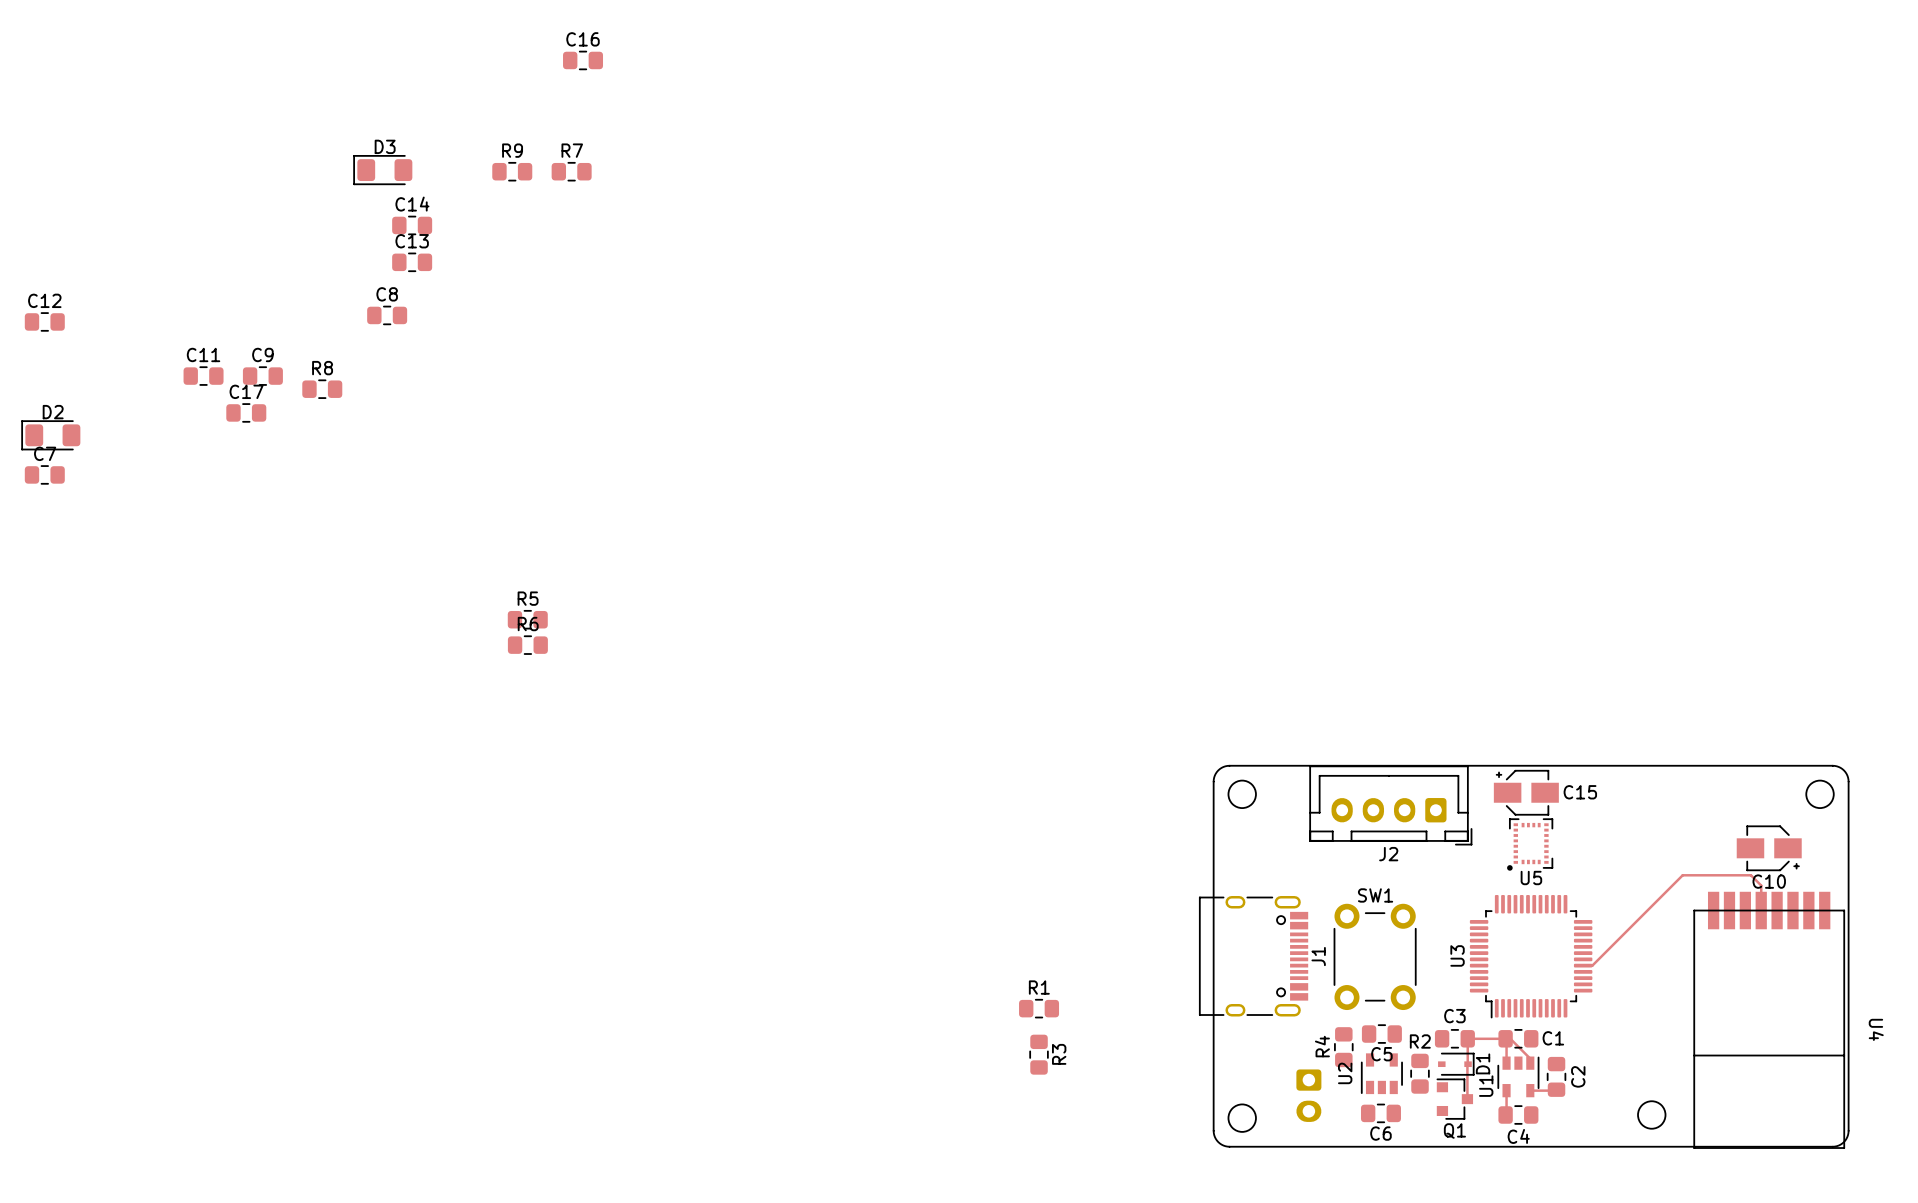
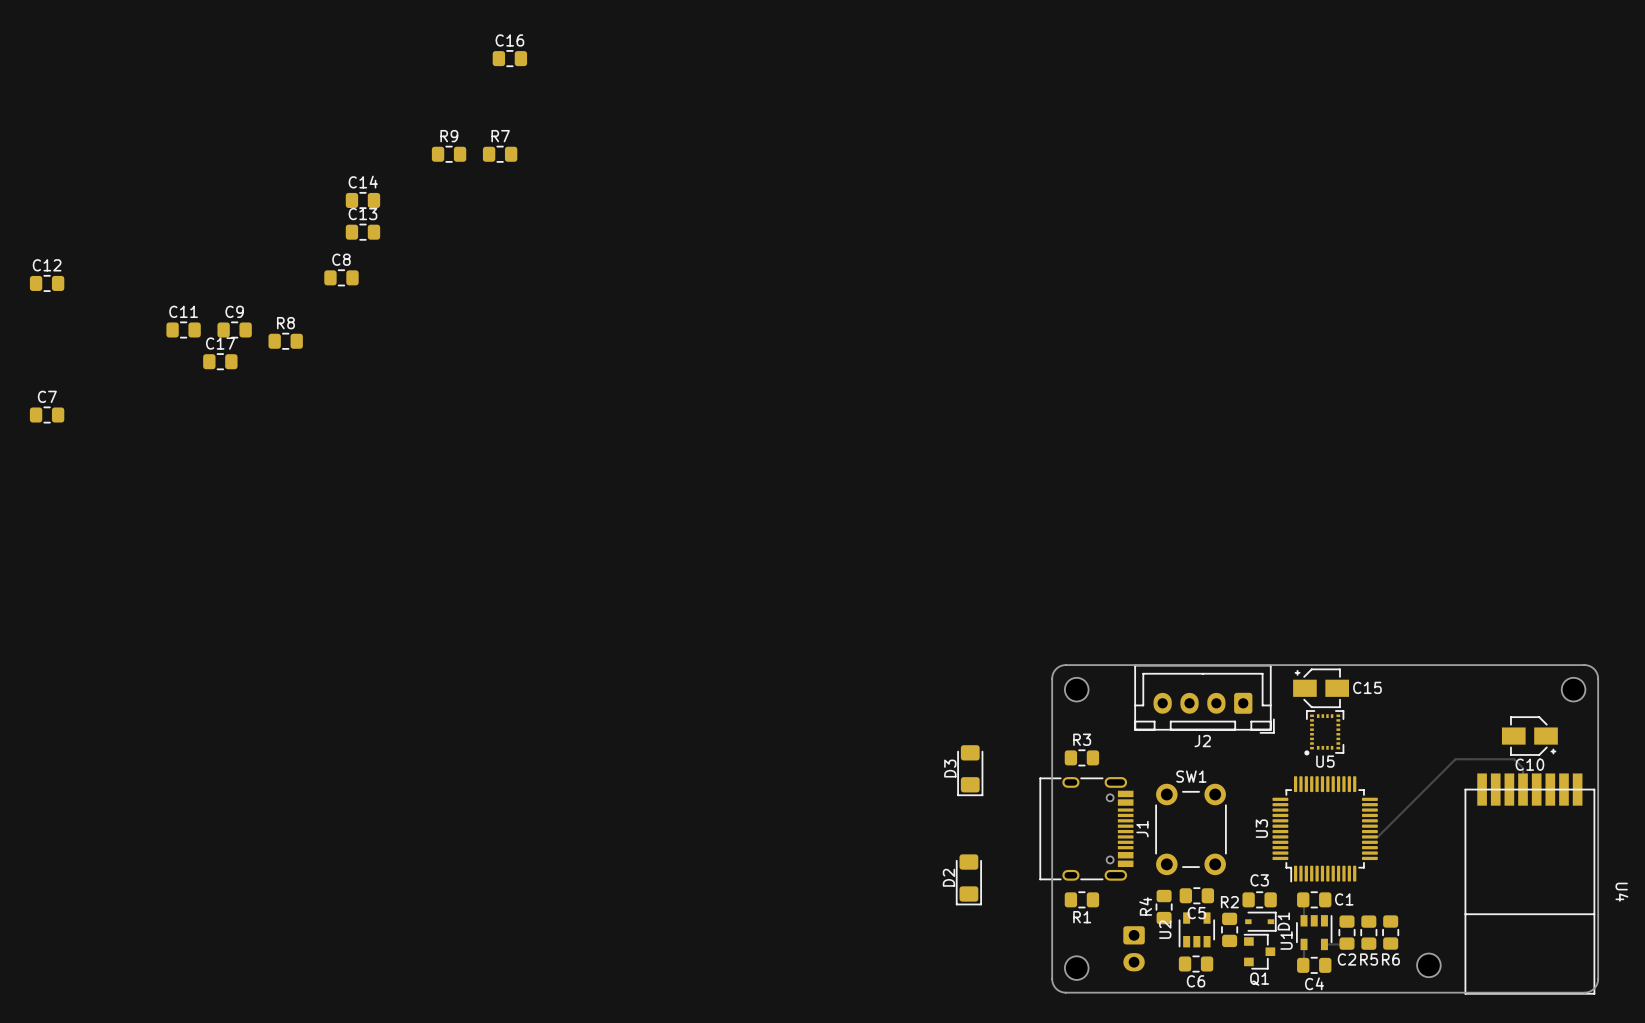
D3 rotation: 0° (382, 170) -> 90° counterclockwise (970, 770)
D3 position: (382, 170) -> (970, 770)
D2 rotation: 0° (50, 435) -> 90° counterclockwise (968, 879)
D2 position: (50, 435) -> (968, 879)
R5 name position: R5 (528, 598) -> R5 (1369, 959)
R5 rotation: 0° (527, 619) -> 90° clockwise (1368, 932)
R5 position: (527, 619) -> (1368, 932)
R6 name position: R6 (528, 624) -> R6 (1390, 959)
R6 rotation: 0° (527, 645) -> 90° clockwise (1390, 932)
R6 position: (527, 645) -> (1390, 932)
R1 name position: R1 (1039, 987) -> R1 (1082, 917)
R1 position: (1039, 1008) -> (1081, 899)
R3 rotation: 0° (1039, 1054) -> 90° clockwise (1081, 757)
R3 position: (1039, 1054) -> (1081, 757)
R3 name position: R3 (1059, 1054) -> R3 (1082, 739)
track: (1530, 1063) (1530, 1058) (1510, 1038) (1467, 1038) (1467, 1099) -> none
C2 name rotation: 0° (1578, 1076) -> 90° clockwise (1346, 959)
C2 name position: C2 (1578, 1076) -> C2 (1346, 959)

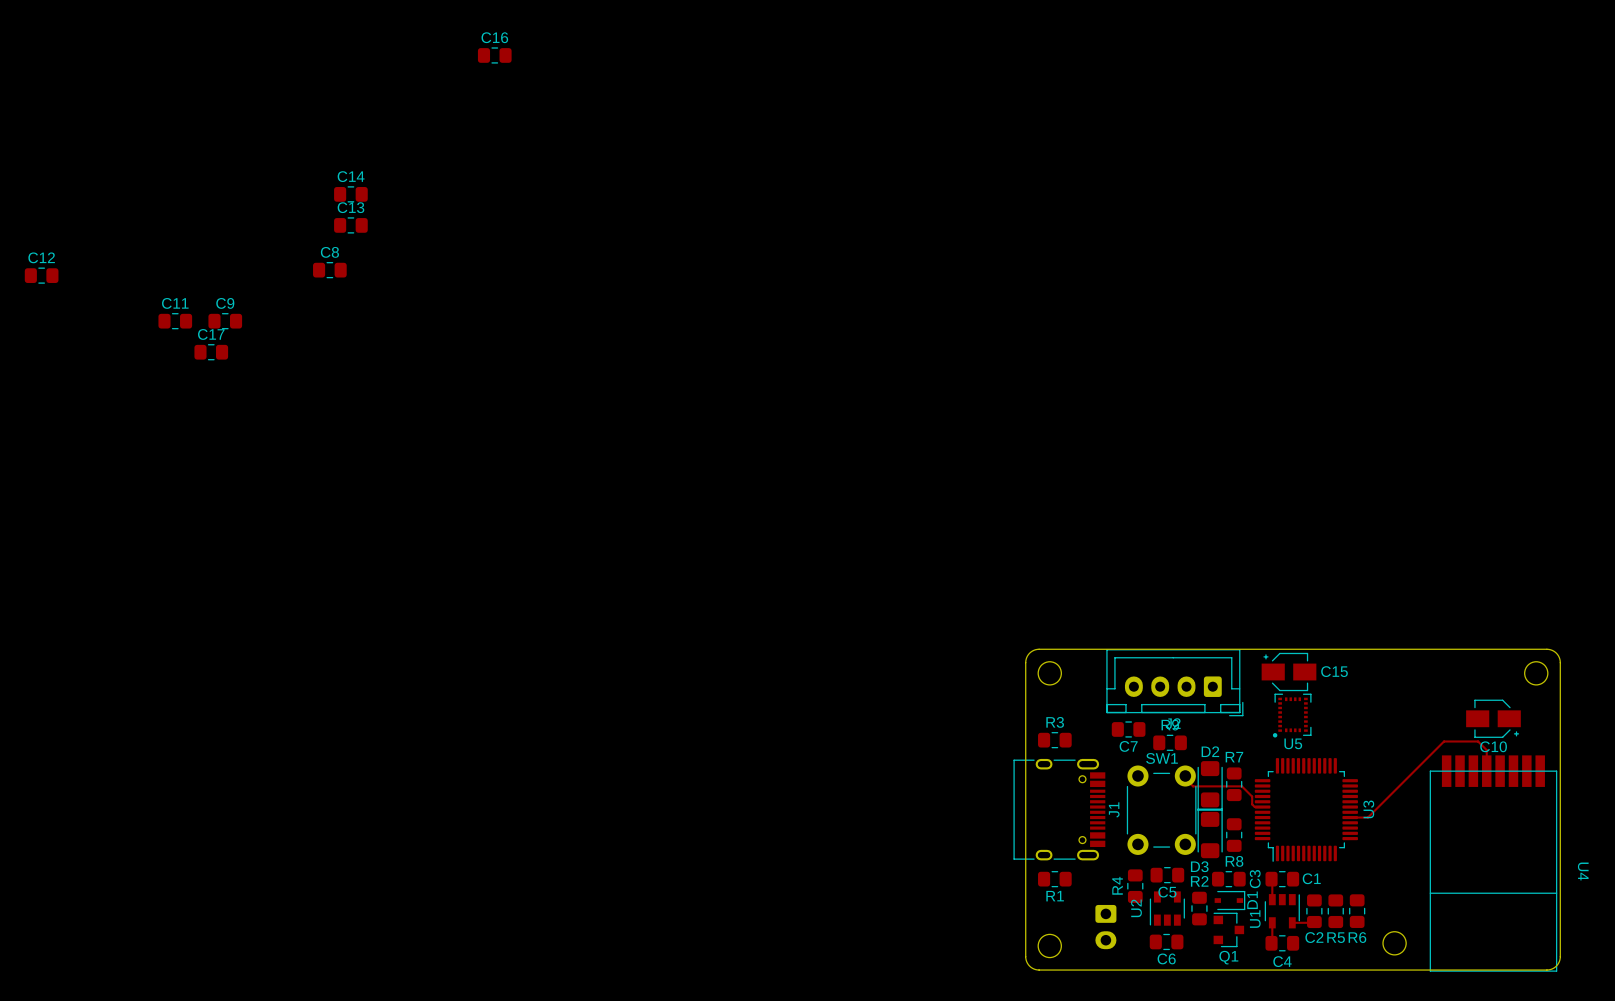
R9 position: (449, 154) -> (1170, 742)
R7 rotation: 0° (500, 154) -> 90° clockwise (1234, 784)
R7 position: (500, 154) -> (1234, 784)
R8 name position: R8 (285, 323) -> R8 (1234, 861)
R8 rotation: 0° (285, 341) -> 90° clockwise (1234, 835)
R8 position: (285, 341) -> (1234, 835)
C7 name position: C7 (47, 396) -> C7 (1128, 746)
C7 position: (47, 415) -> (1128, 729)
track: (1479, 759) (1455, 759) (1377, 836) (1369, 836) -> (1444, 741) (1367, 817) (1350, 817)
D3 name position: D3 (950, 768) -> D3 (1199, 866)
D3 rotation: 0° (970, 770) -> 180° (1210, 833)
D3 position: (970, 770) -> (1210, 833)
track: none -> (1179, 773) (1193, 786) (1241, 786) (1252, 796) (1252, 804) (1254, 807) (1262, 807)
U3 name position: U3 (1261, 828) -> U3 (1368, 809)
U3 position: (1325, 829) -> (1306, 809)
D2 name rotation: 0° (948, 877) -> 90° clockwise (1210, 751)
D2 name position: D2 (948, 877) -> D2 (1210, 751)
D2 position: (968, 879) -> (1210, 785)
C3 name rotation: 0° (1259, 880) -> 90° counterclockwise (1255, 879)
C3 name position: C3 (1259, 880) -> C3 (1255, 879)

